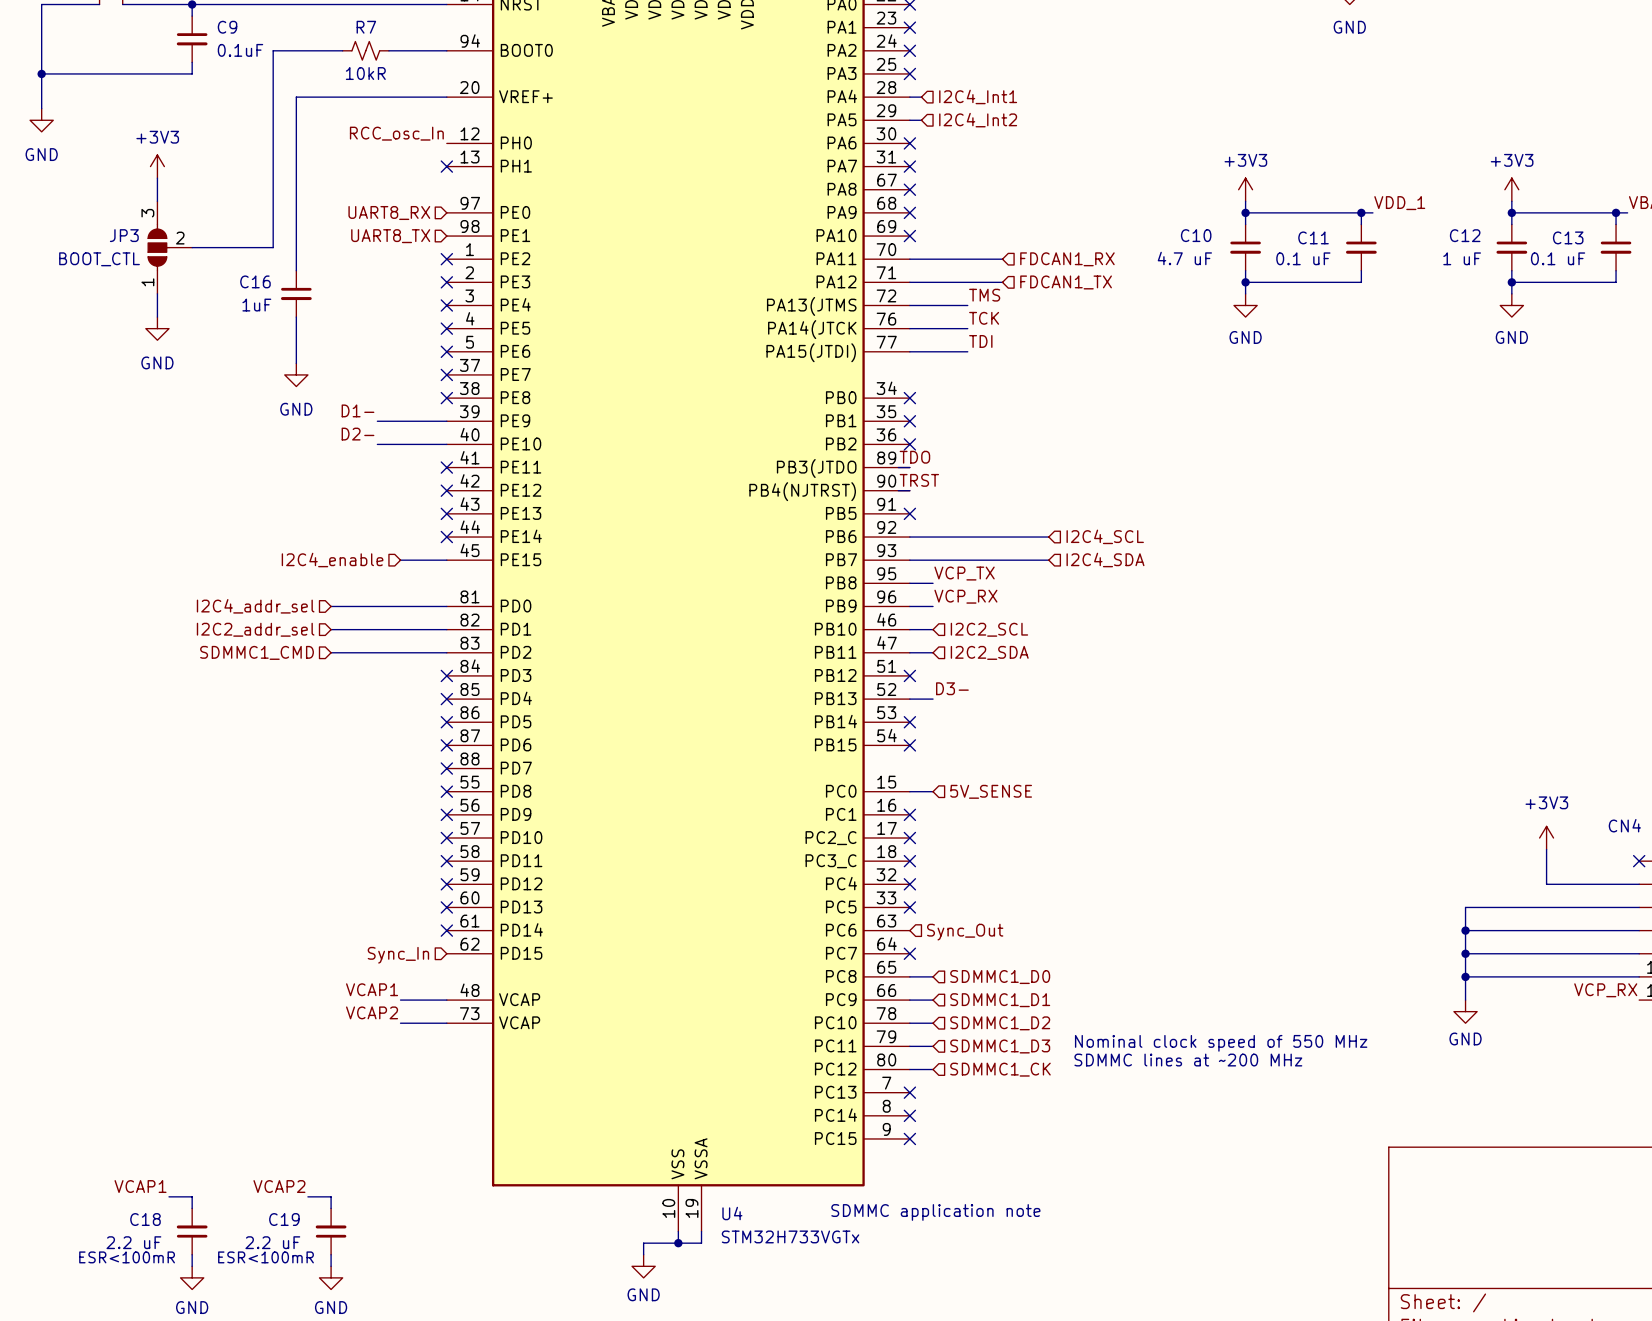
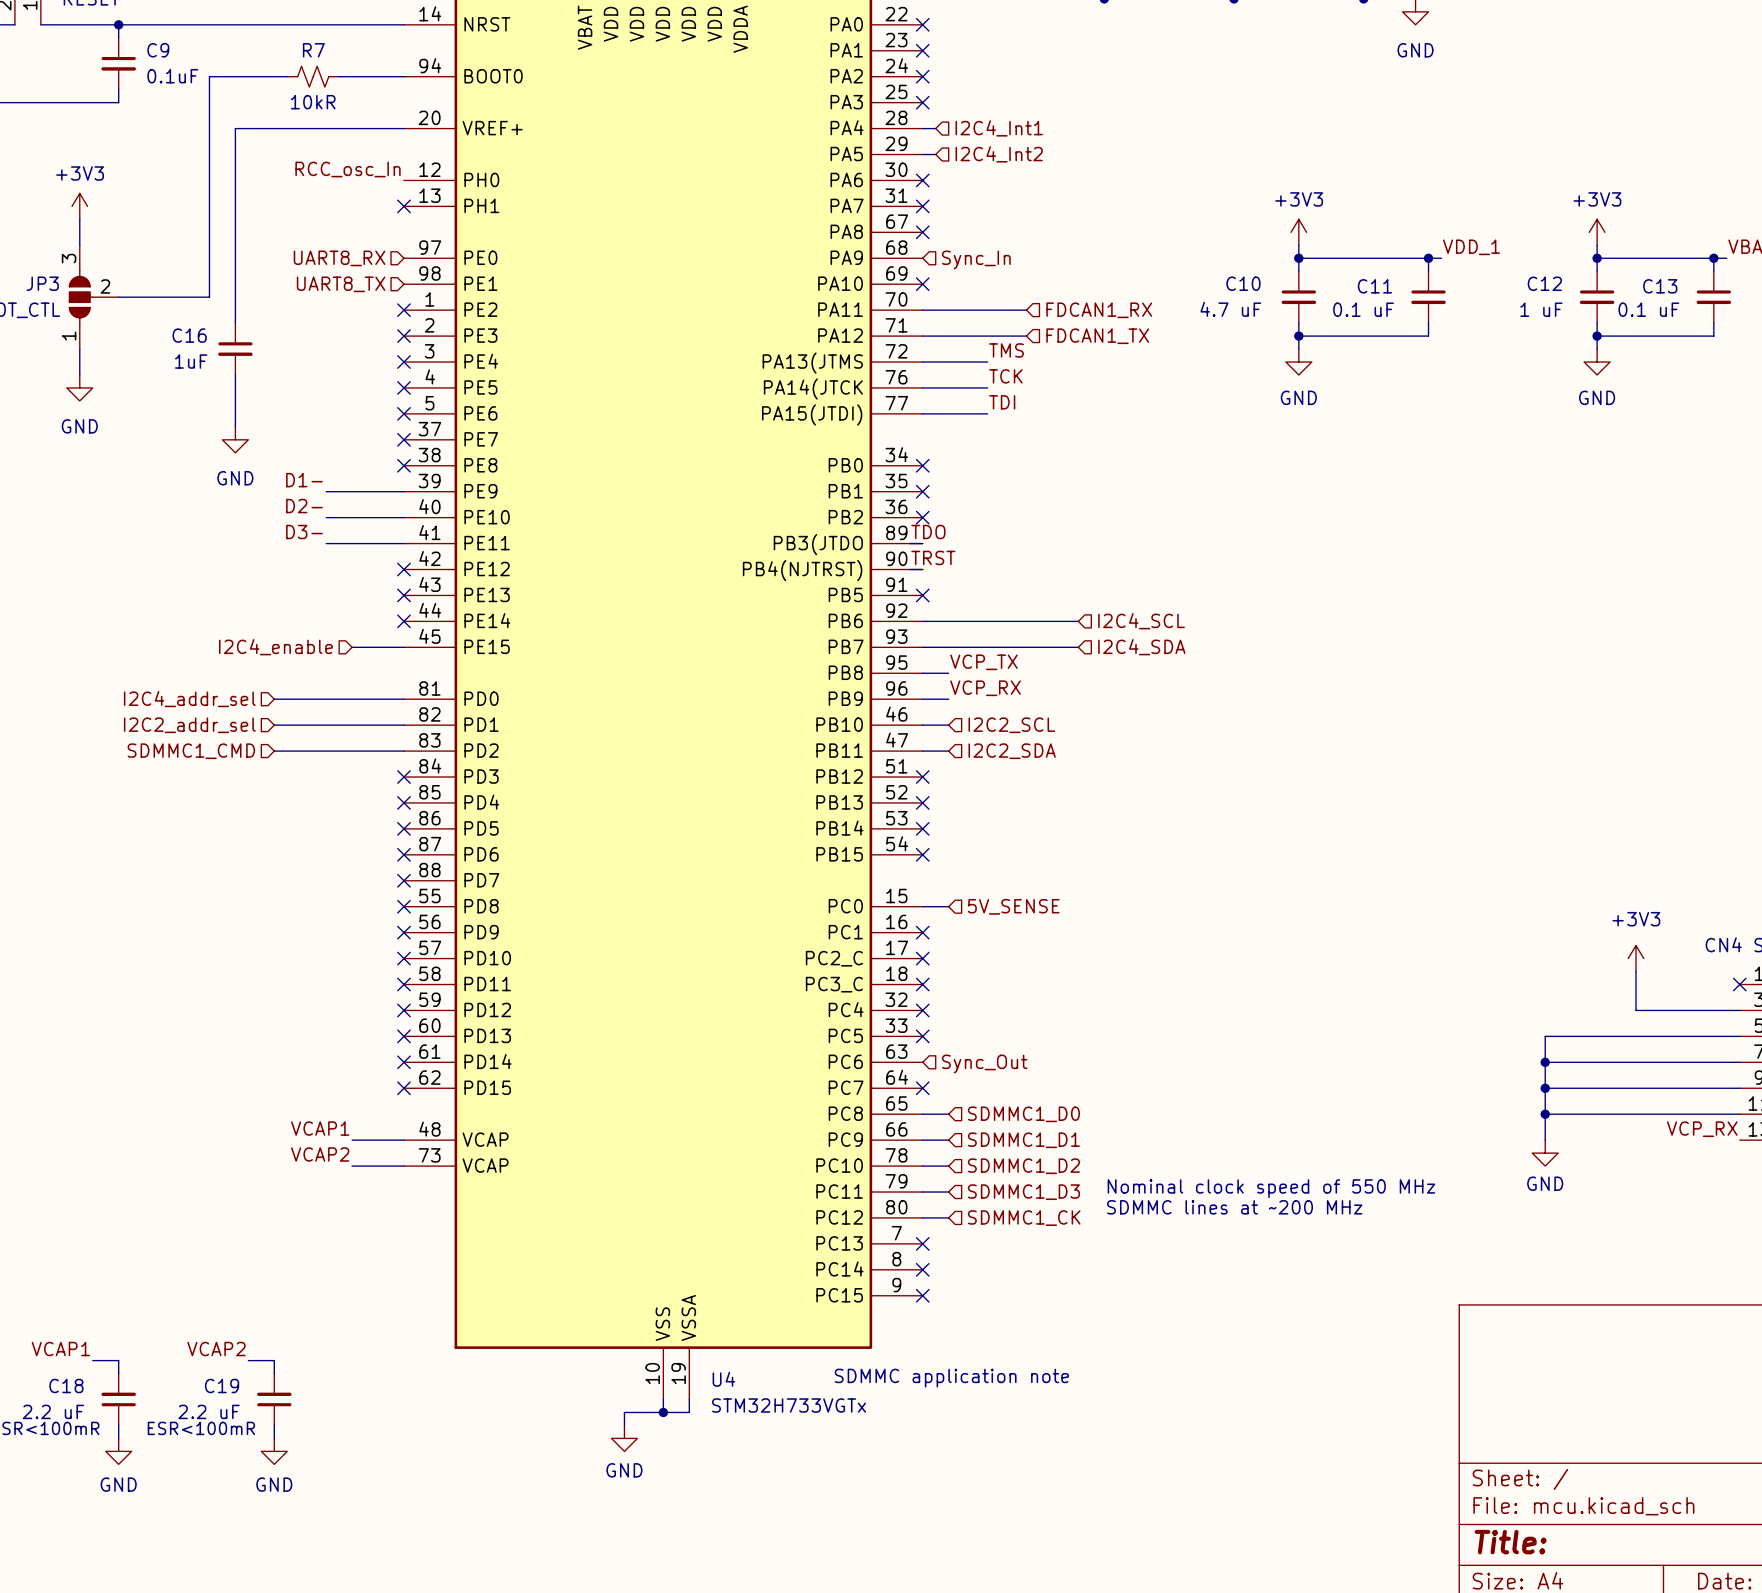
no-connect mark: (909, 212) -> none
hierarchical label: none -> Sync_In (976, 259)
label: none -> D3- (304, 532)
wire: none -> (326, 543) (403, 543)
no-connect mark: (446, 467) -> none
label: D3- (952, 688) -> none
wire: (909, 699) (933, 699) -> none
no-connect mark: none -> (922, 802)
no-connect mark: none -> (403, 1088)
hierarchical label: Sync_In (398, 955) -> none

